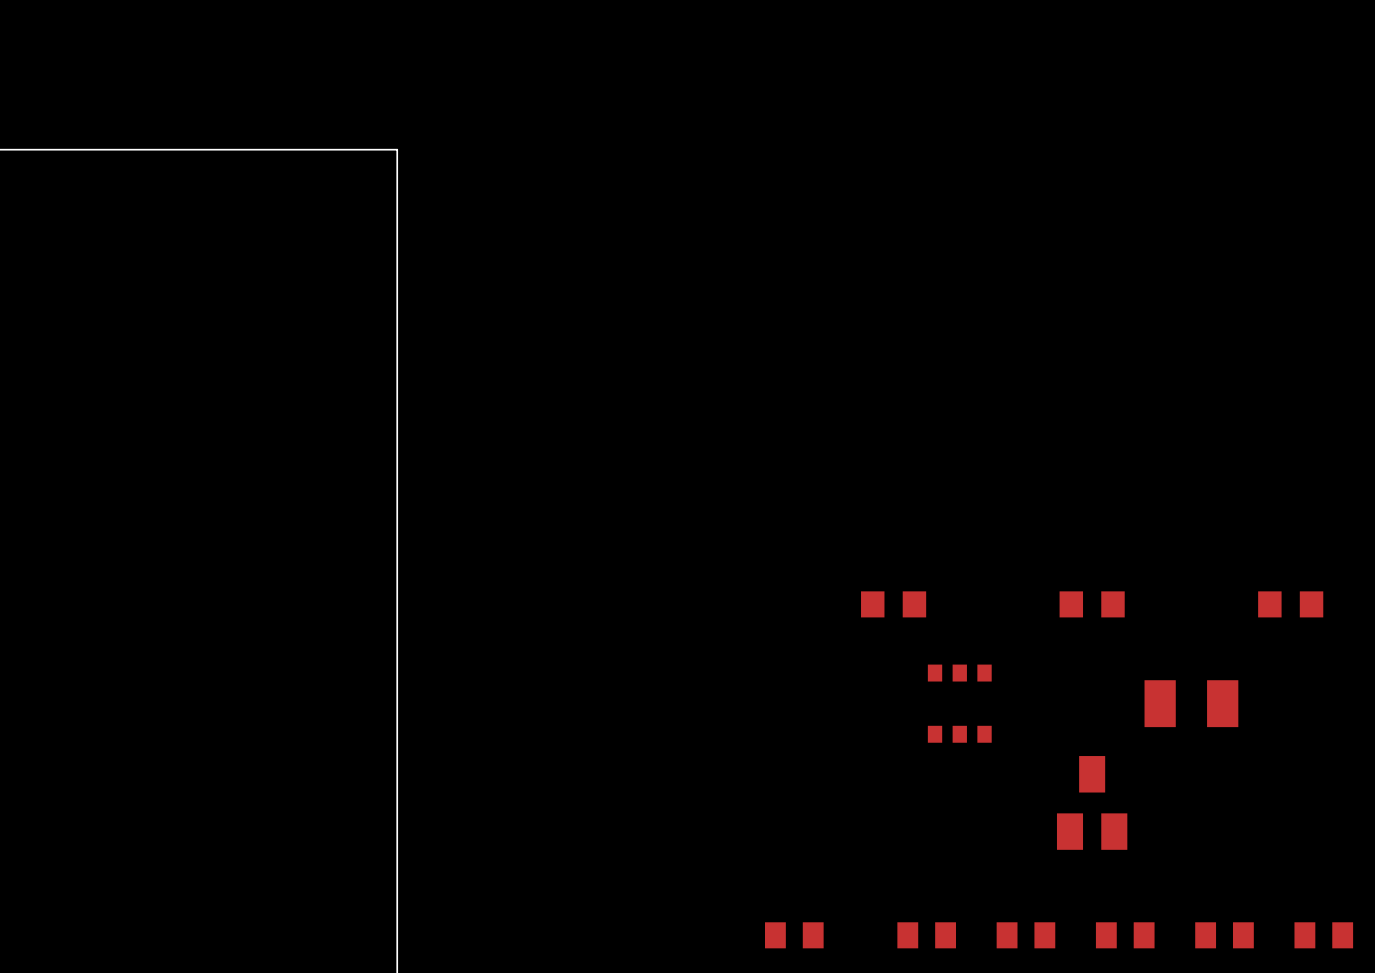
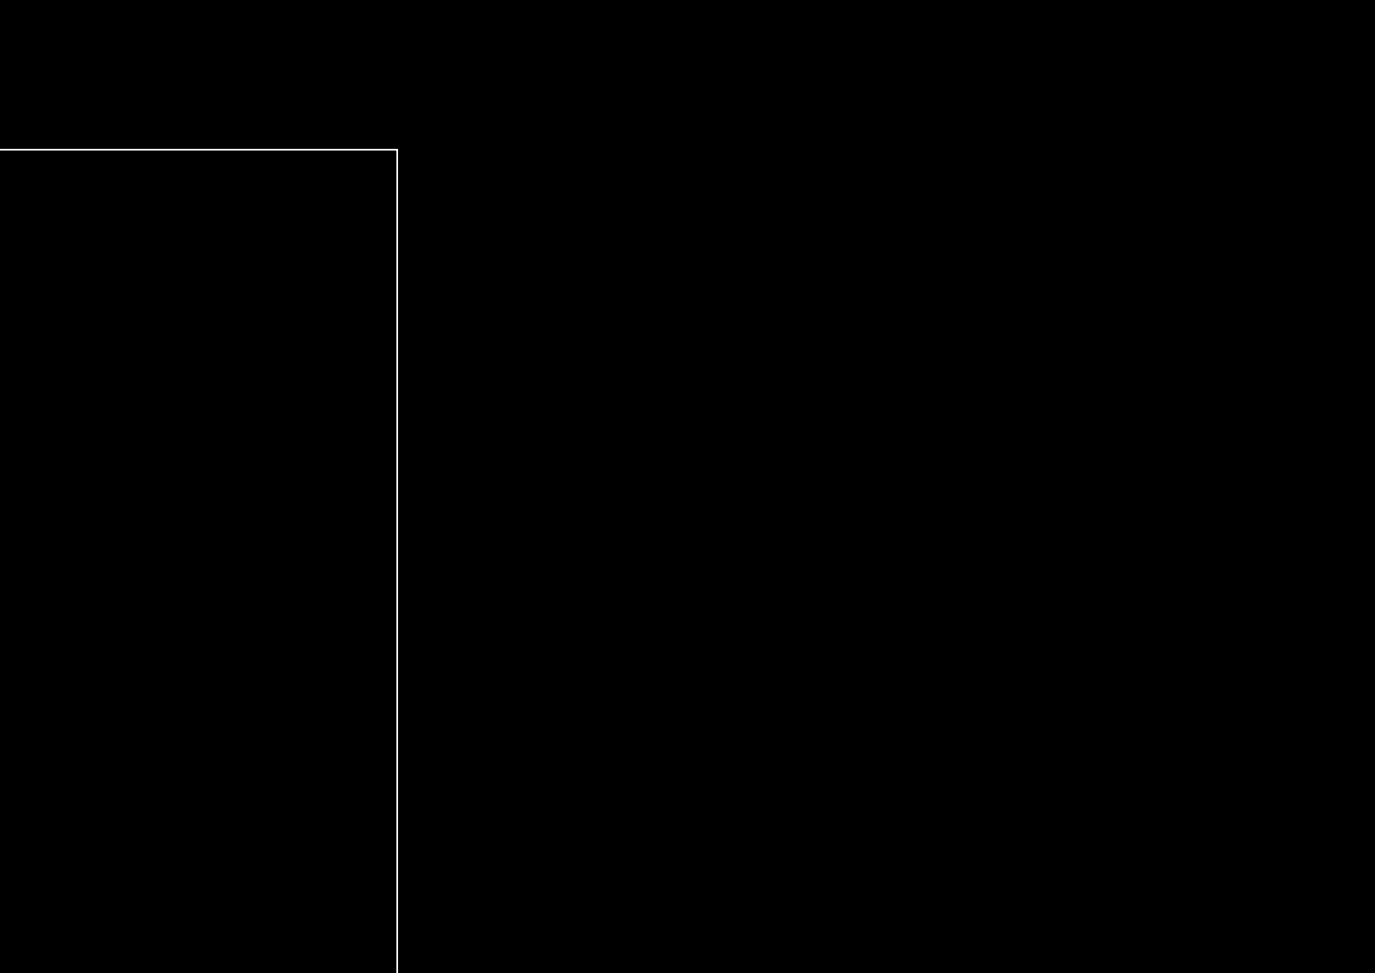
part: (893, 604) -> none
part: (1092, 604) -> none
part: (1290, 604) -> none
part: (959, 703) -> none
part: (1191, 703) -> none
part: (1092, 802) -> none
part: (794, 935) -> none
part: (926, 935) -> none
part: (1025, 935) -> none
part: (1125, 935) -> none
part: (1224, 935) -> none
part: (1323, 935) -> none

